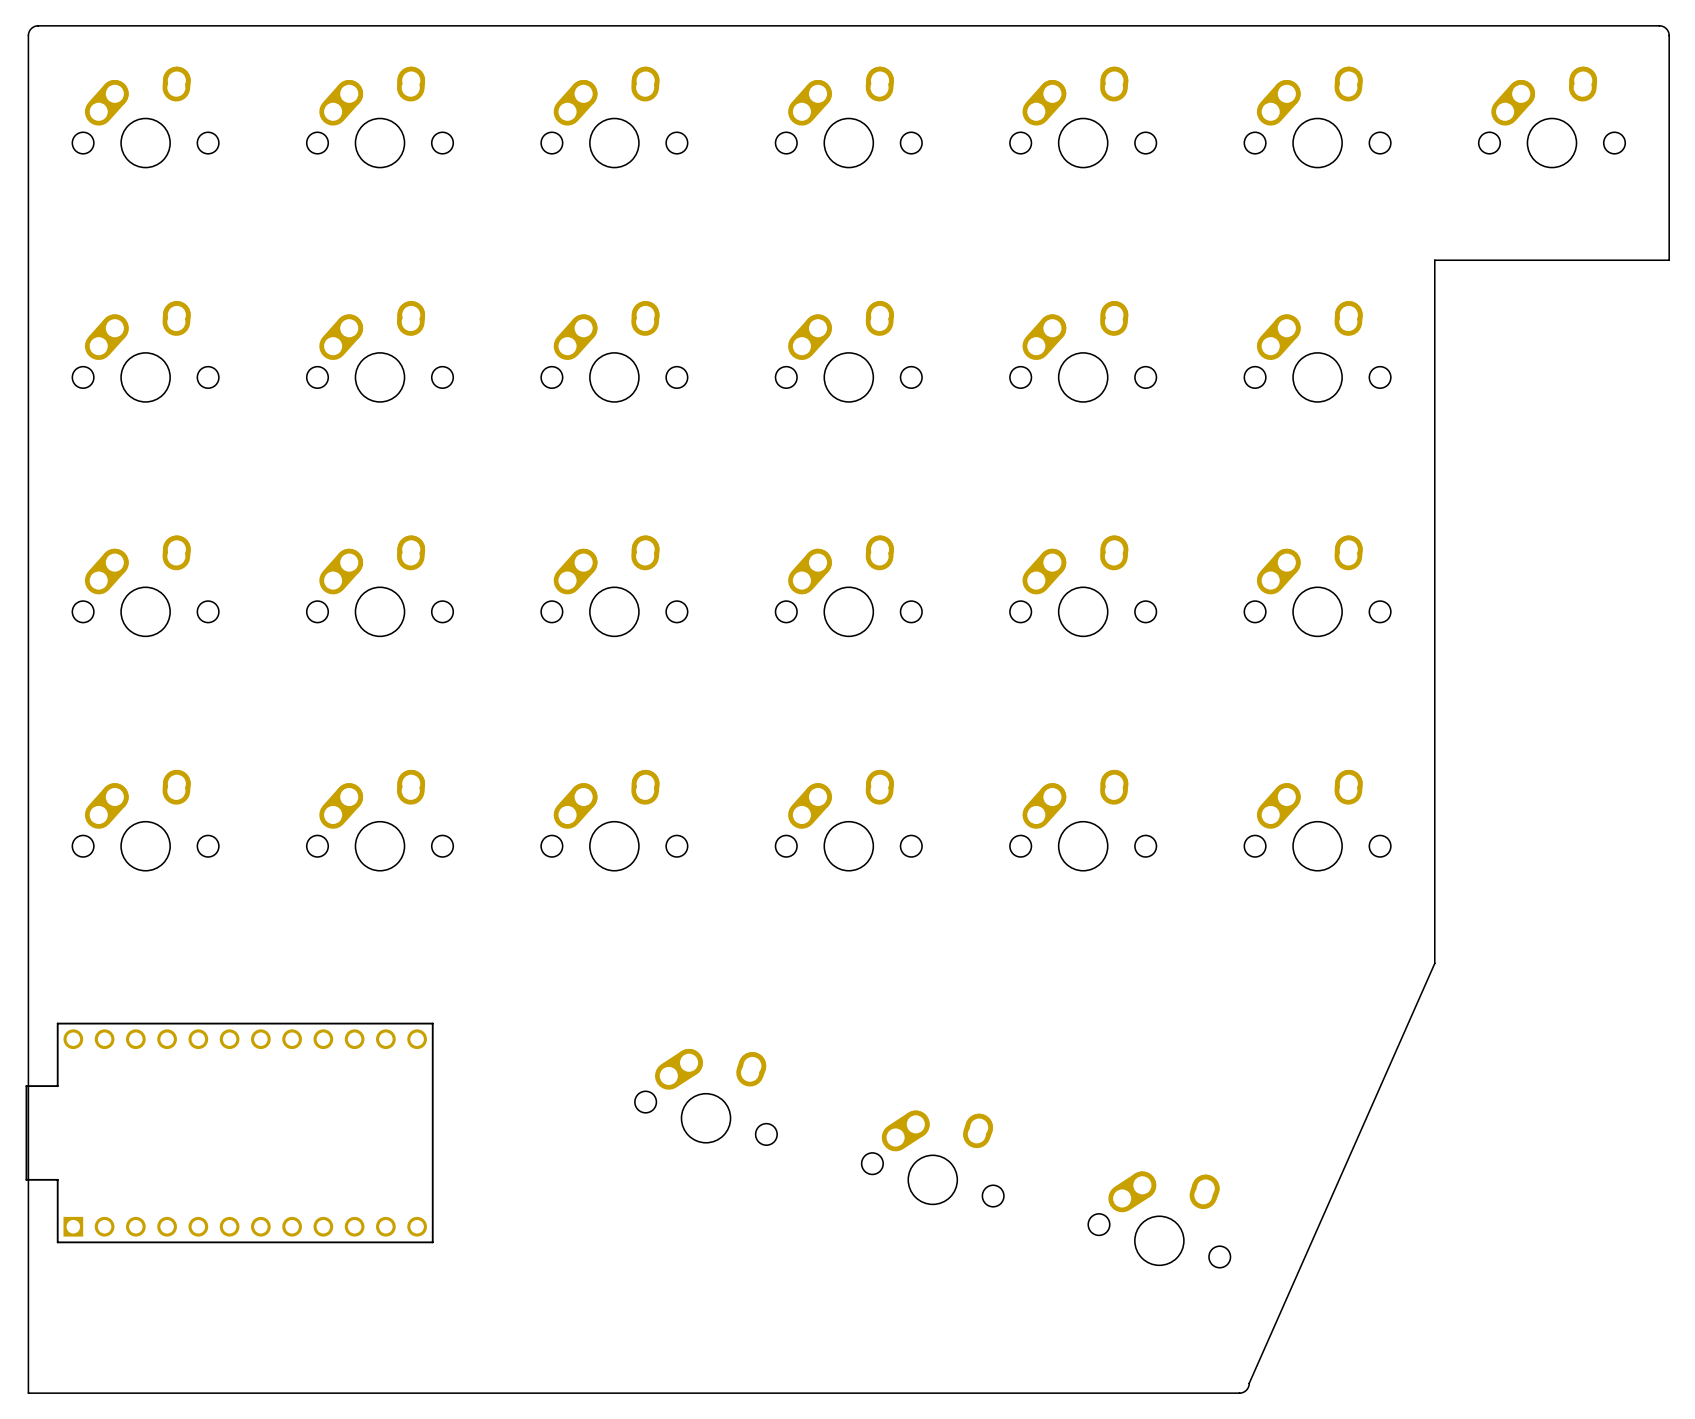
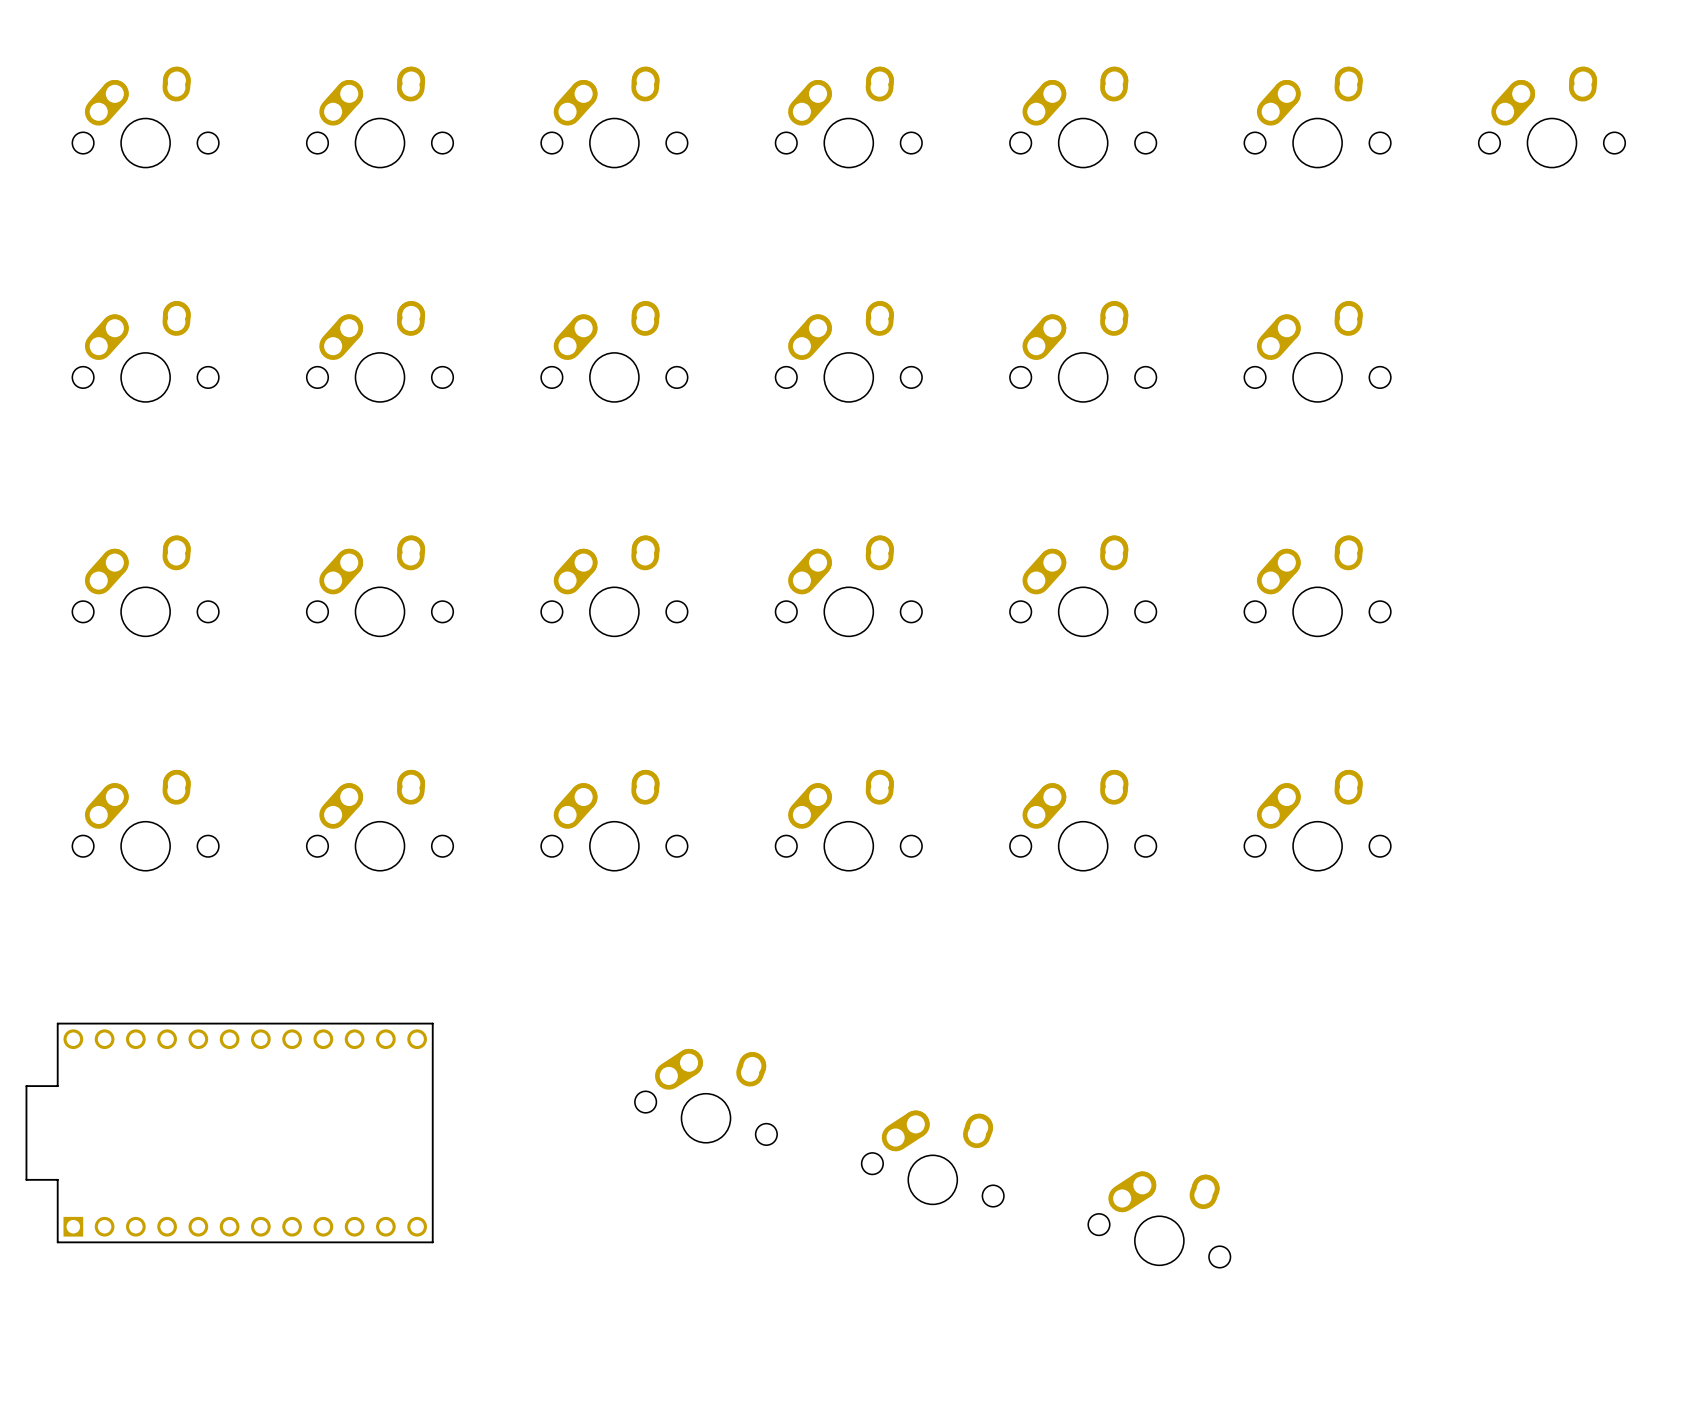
board edge: (38, 25) (1659, 25) (1666, 28) (1669, 35) (1669, 260) (1434, 260) (1434, 963) (1246, 1390) (1239, 1393) (28, 1393) (28, 35) (31, 28) (38, 25) -> none

